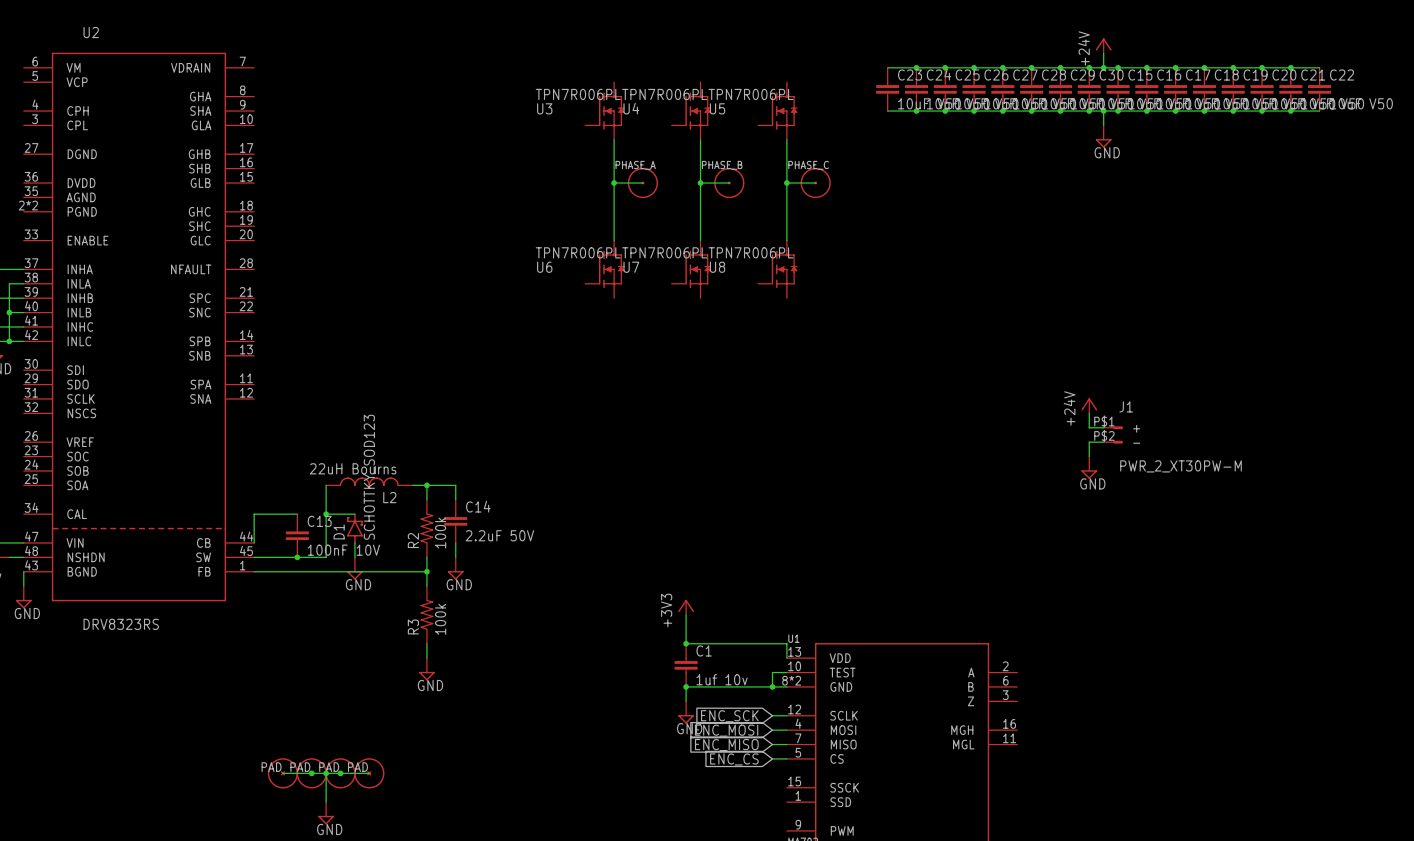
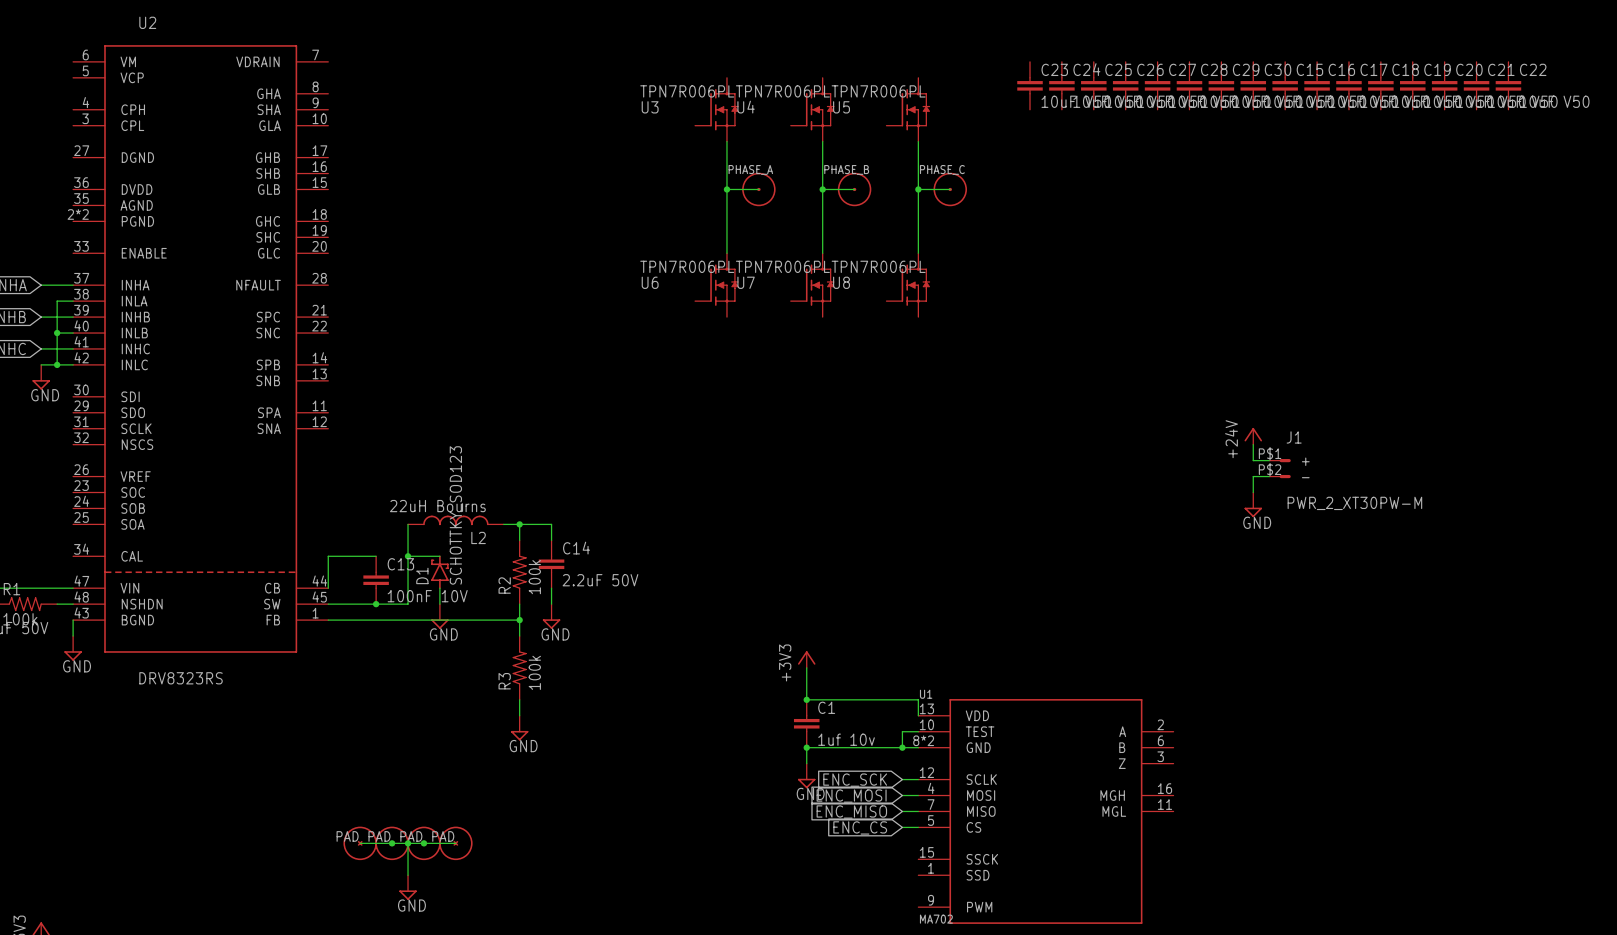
power symbol: +24V (1103, 45) -> none
wire: (1103, 53) (1103, 67) -> none
wire: (887, 67) (1319, 67) -> none
junction: (916, 67) -> none
junction: (945, 67) -> none
junction: (974, 67) -> none
junction: (1002, 67) -> none
junction: (1031, 67) -> none
junction: (1060, 67) -> none
junction: (1089, 67) -> none
junction: (1103, 67) -> none
junction: (1118, 67) -> none
junction: (1146, 67) -> none
junction: (1175, 67) -> none
junction: (1204, 67) -> none
junction: (1233, 67) -> none
junction: (1262, 67) -> none
junction: (1290, 67) -> none
wire: (887, 111) (1319, 111) -> none
junction: (916, 111) -> none
junction: (945, 111) -> none
junction: (974, 111) -> none
junction: (1002, 111) -> none
junction: (1031, 111) -> none
junction: (1060, 111) -> none
junction: (1089, 111) -> none
wire: (1103, 111) (1103, 125) -> none
junction: (1103, 111) -> none
junction: (1118, 111) -> none
junction: (1146, 111) -> none
junction: (1175, 111) -> none
junction: (1204, 111) -> none
junction: (1233, 111) -> none
junction: (1262, 111) -> none
junction: (1290, 111) -> none
power symbol: GND (1103, 136) -> none

